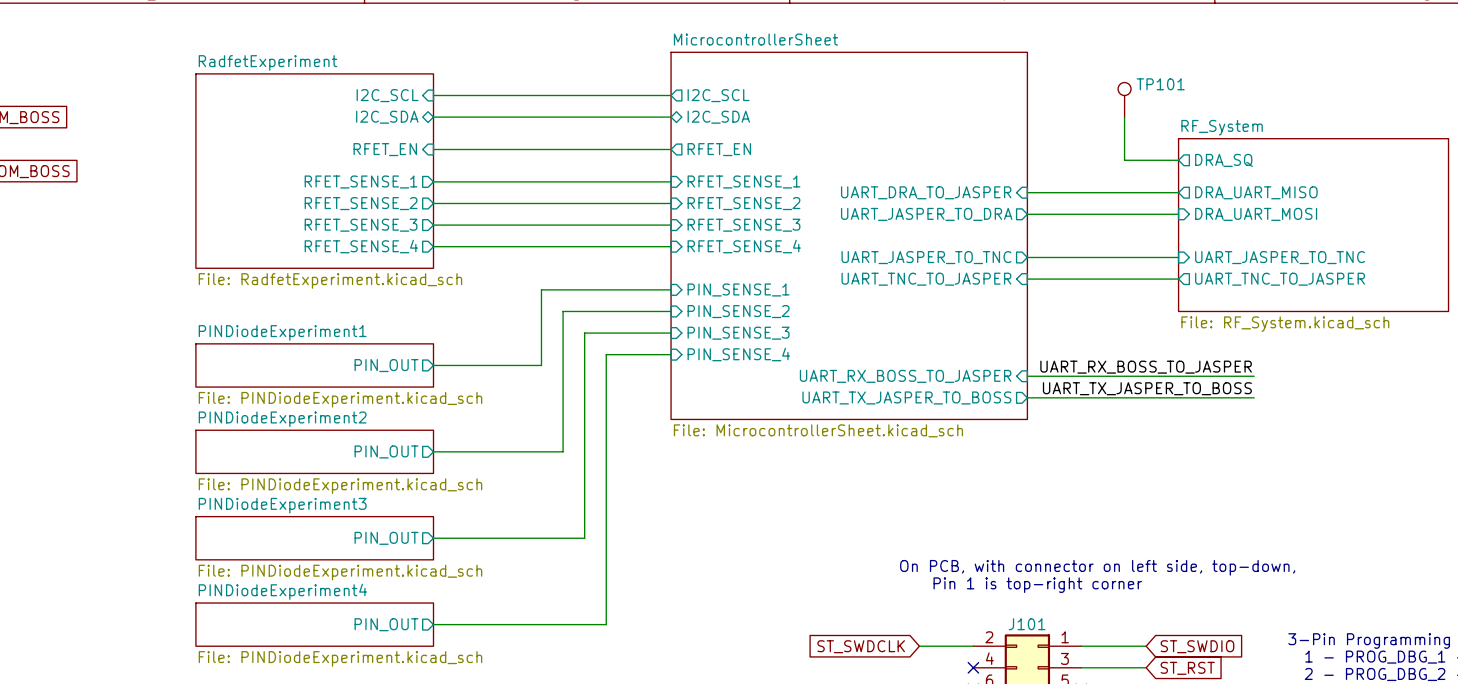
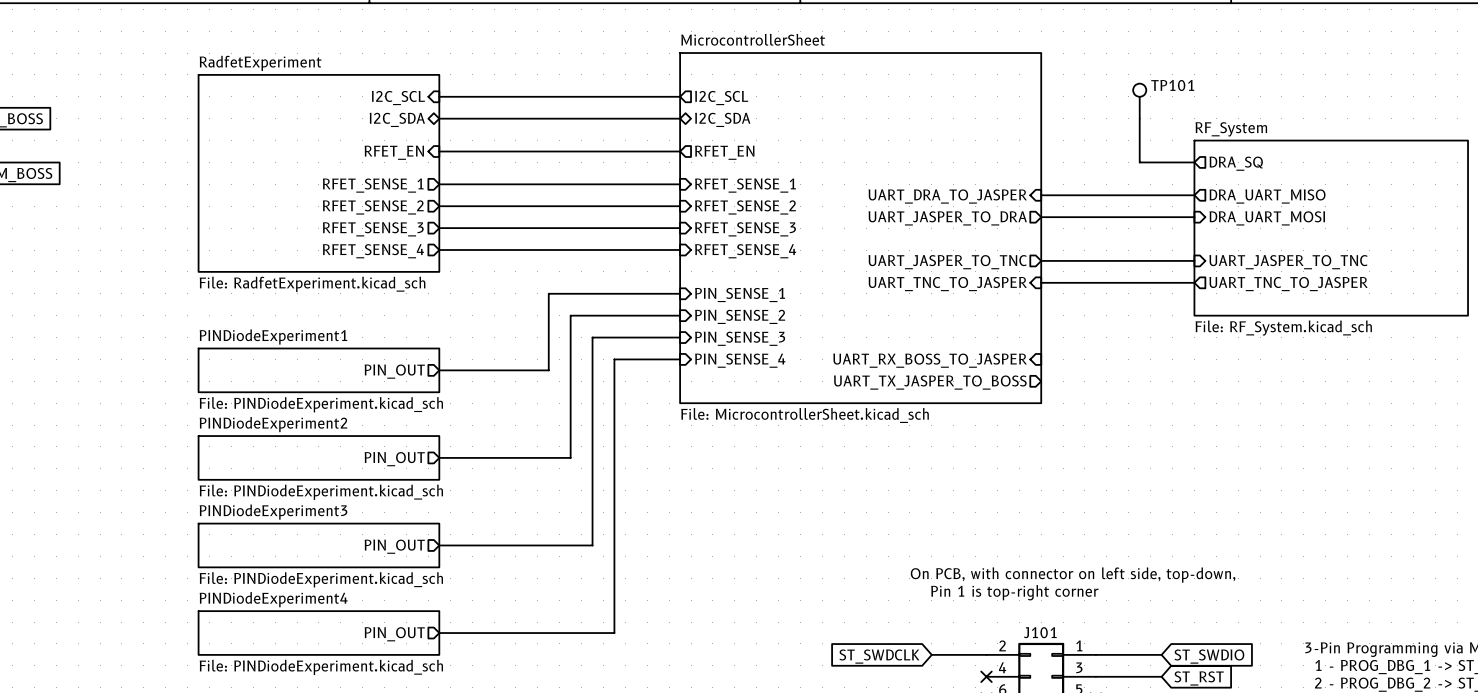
sheet MicrocontrollerSheet: none -> File: MicrocontrollerSheet.kicad_sch (860, 228)
sheet MicrocontrollerSheet: File: MicrocontrollerSheet.kicad_sch (849, 235) -> none
sheet pin: none -> UART_RX_BOSS_TO_JASPER (930, 360)
label: UART_RX_BOSS_TO_JASPER (1146, 367) -> none
sheet pin shape: input (905, 376) -> output (930, 382)
sheet pin: UART_RX_BOSS_TO_JASPER (905, 376) -> UART_TX_JASPER_TO_BOSS (930, 382)
wire: (1027, 376) (1254, 376) -> none
label: UART_TX_JASPER_TO_BOSS (1147, 388) -> none
sheet pin: UART_TX_JASPER_TO_BOSS (906, 397) -> none
wire: (1027, 397) (1254, 397) -> none

